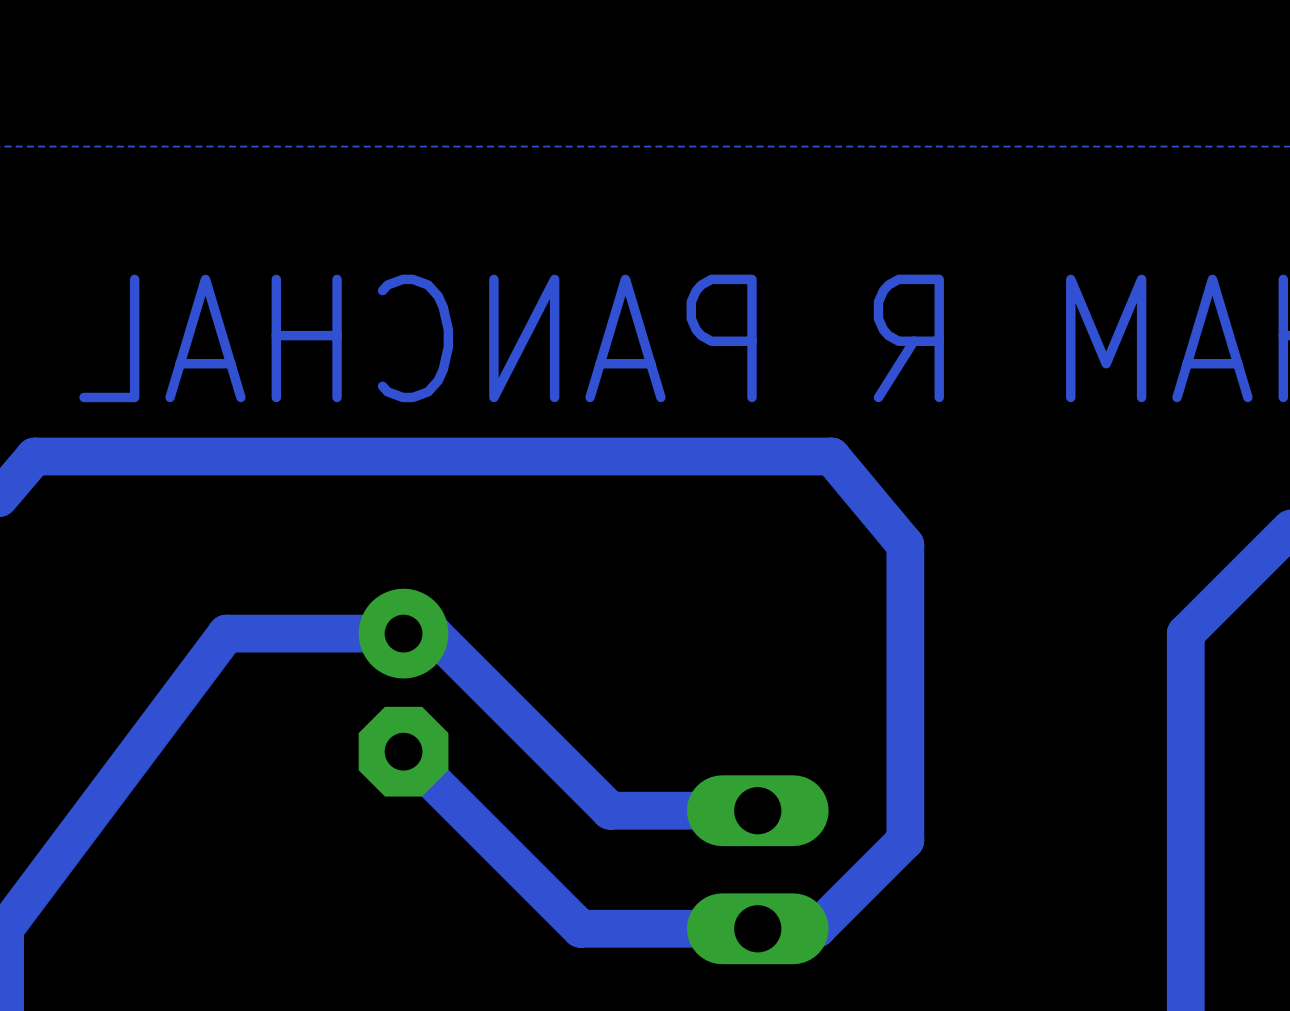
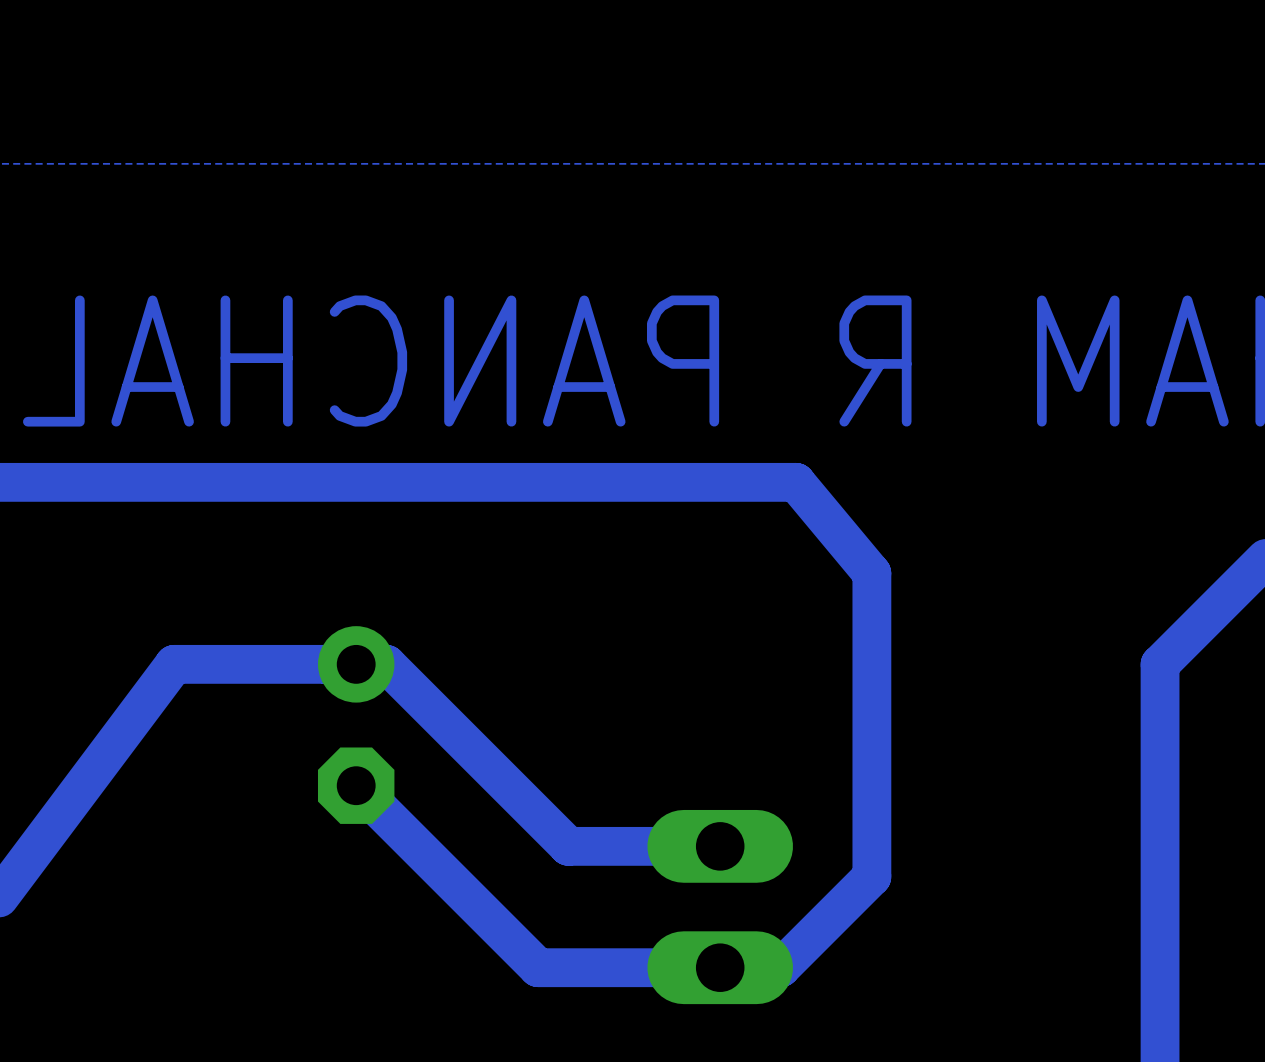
part footprint: [358, 588, 449, 797] -> [317, 626, 395, 824]

